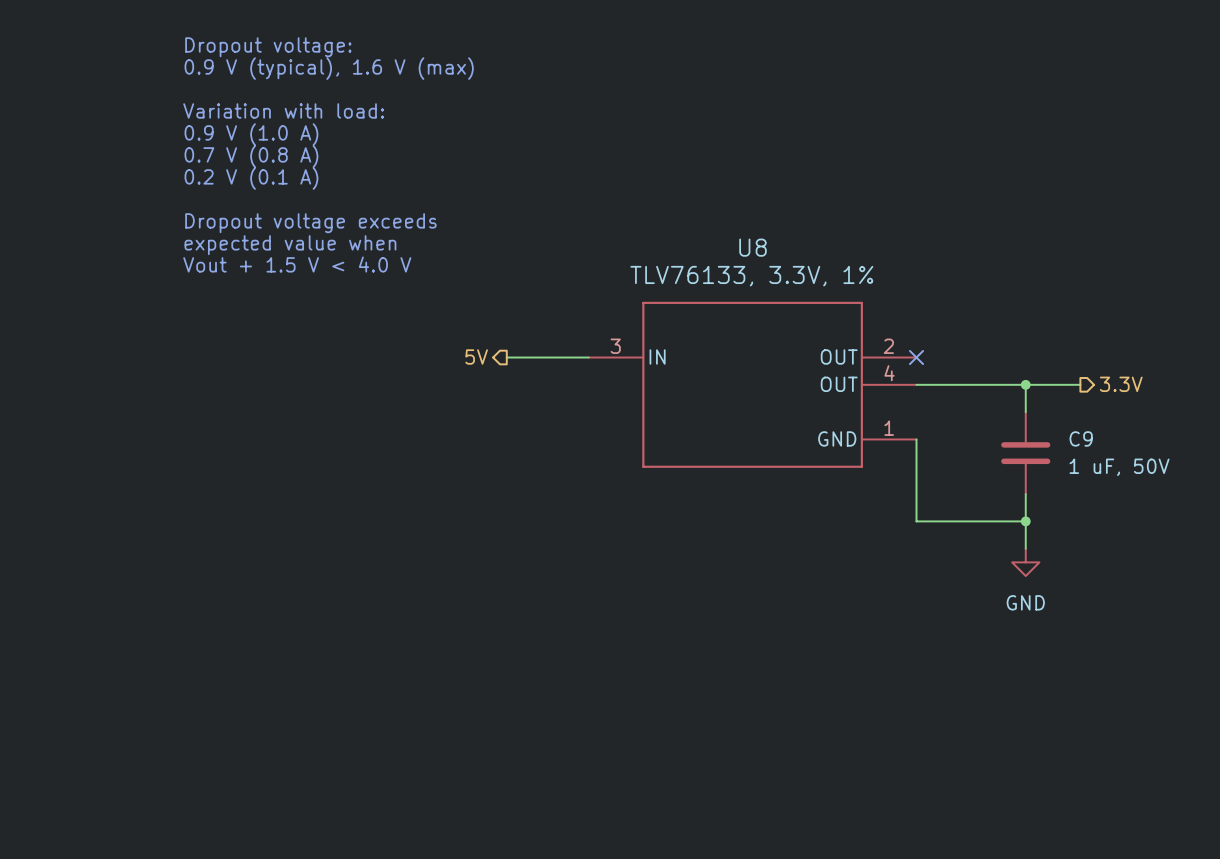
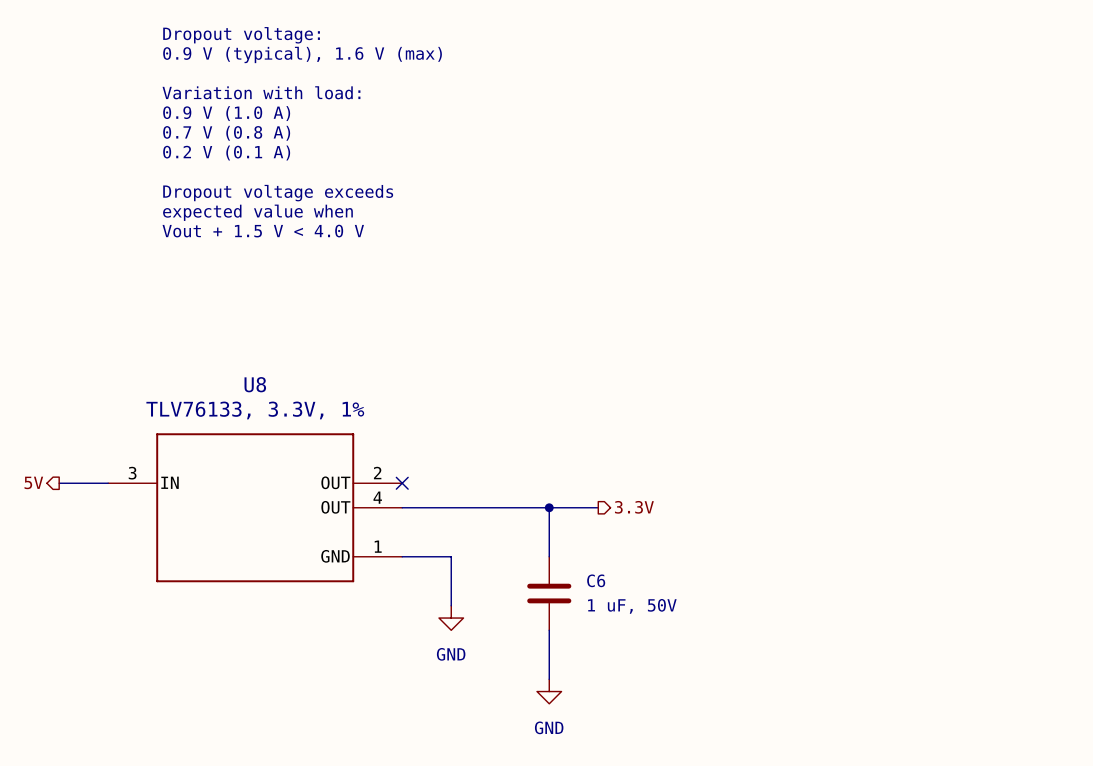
hierarchical label: 5V (476, 357) -> none
wire: (506, 357) (588, 357) -> none
no-connect mark: (916, 357) -> none
U8 position: (752, 384) -> (255, 507)
wire: (916, 384) (1080, 384) -> none
wire: (1025, 384) (1025, 412) -> none
junction: (1025, 384) -> none
hierarchical label: 3.3V (1121, 384) -> none
wire: (916, 439) (916, 521) (1025, 521) -> none
C9: 1 uF, 50V (1025, 453) -> none
wire: (1025, 494) (1025, 548) -> none
junction: (1025, 521) -> none
hierarchical label: none -> 5V (33, 482)
wire: none -> (59, 483) (108, 483)
no-connect mark: none -> (402, 483)
power symbol: GND (1025, 562) -> none
hierarchical label: none -> 3.3V (634, 507)
wire: none -> (402, 507) (598, 507)
wire: none -> (549, 507) (549, 556)
junction: none -> (549, 507)
wire: none -> (402, 556) (451, 556) (451, 605)
C6: none -> 1 uF, 50V (549, 593)
power symbol: none -> GND (451, 618)
wire: none -> (549, 630) (549, 679)
power symbol: none -> GND (549, 691)

